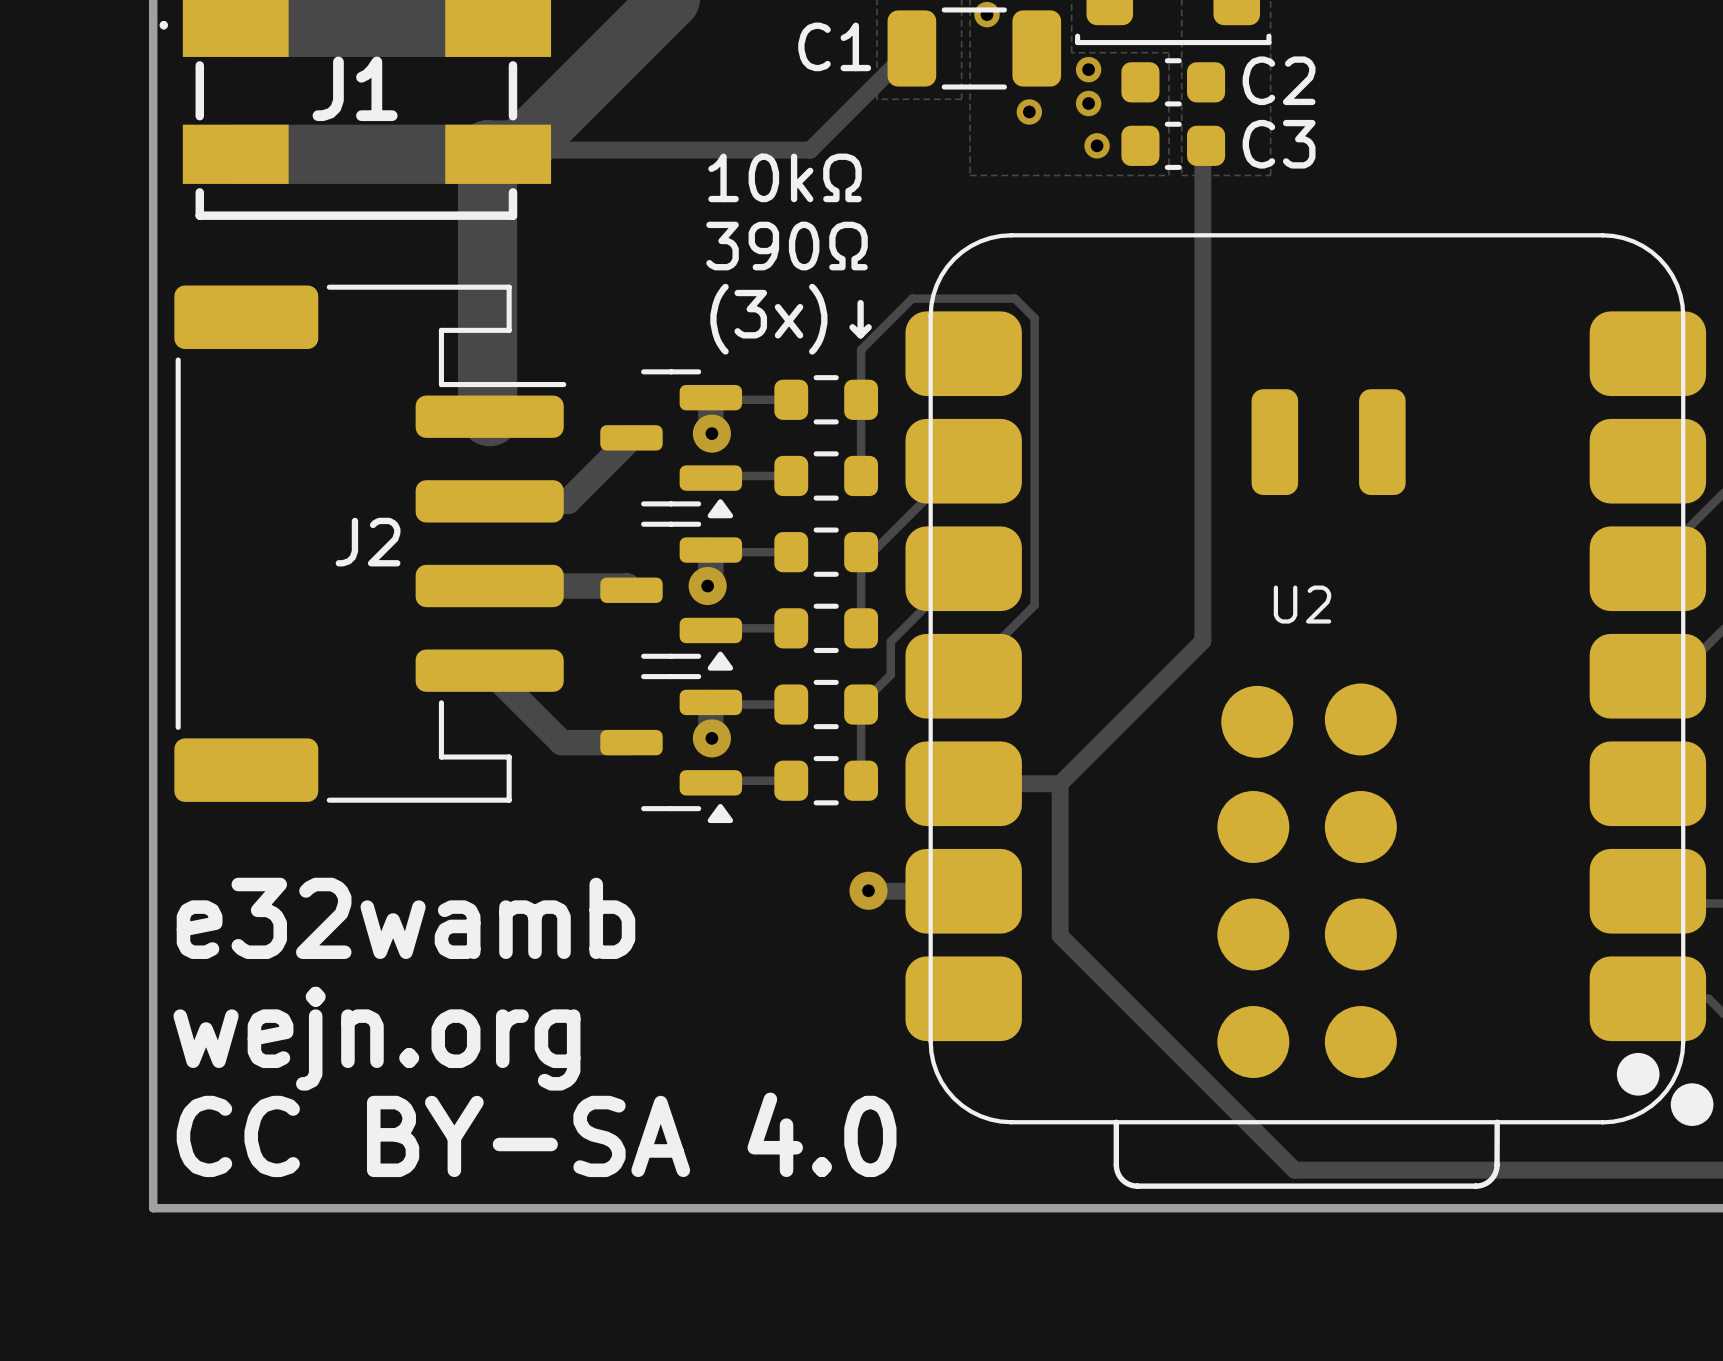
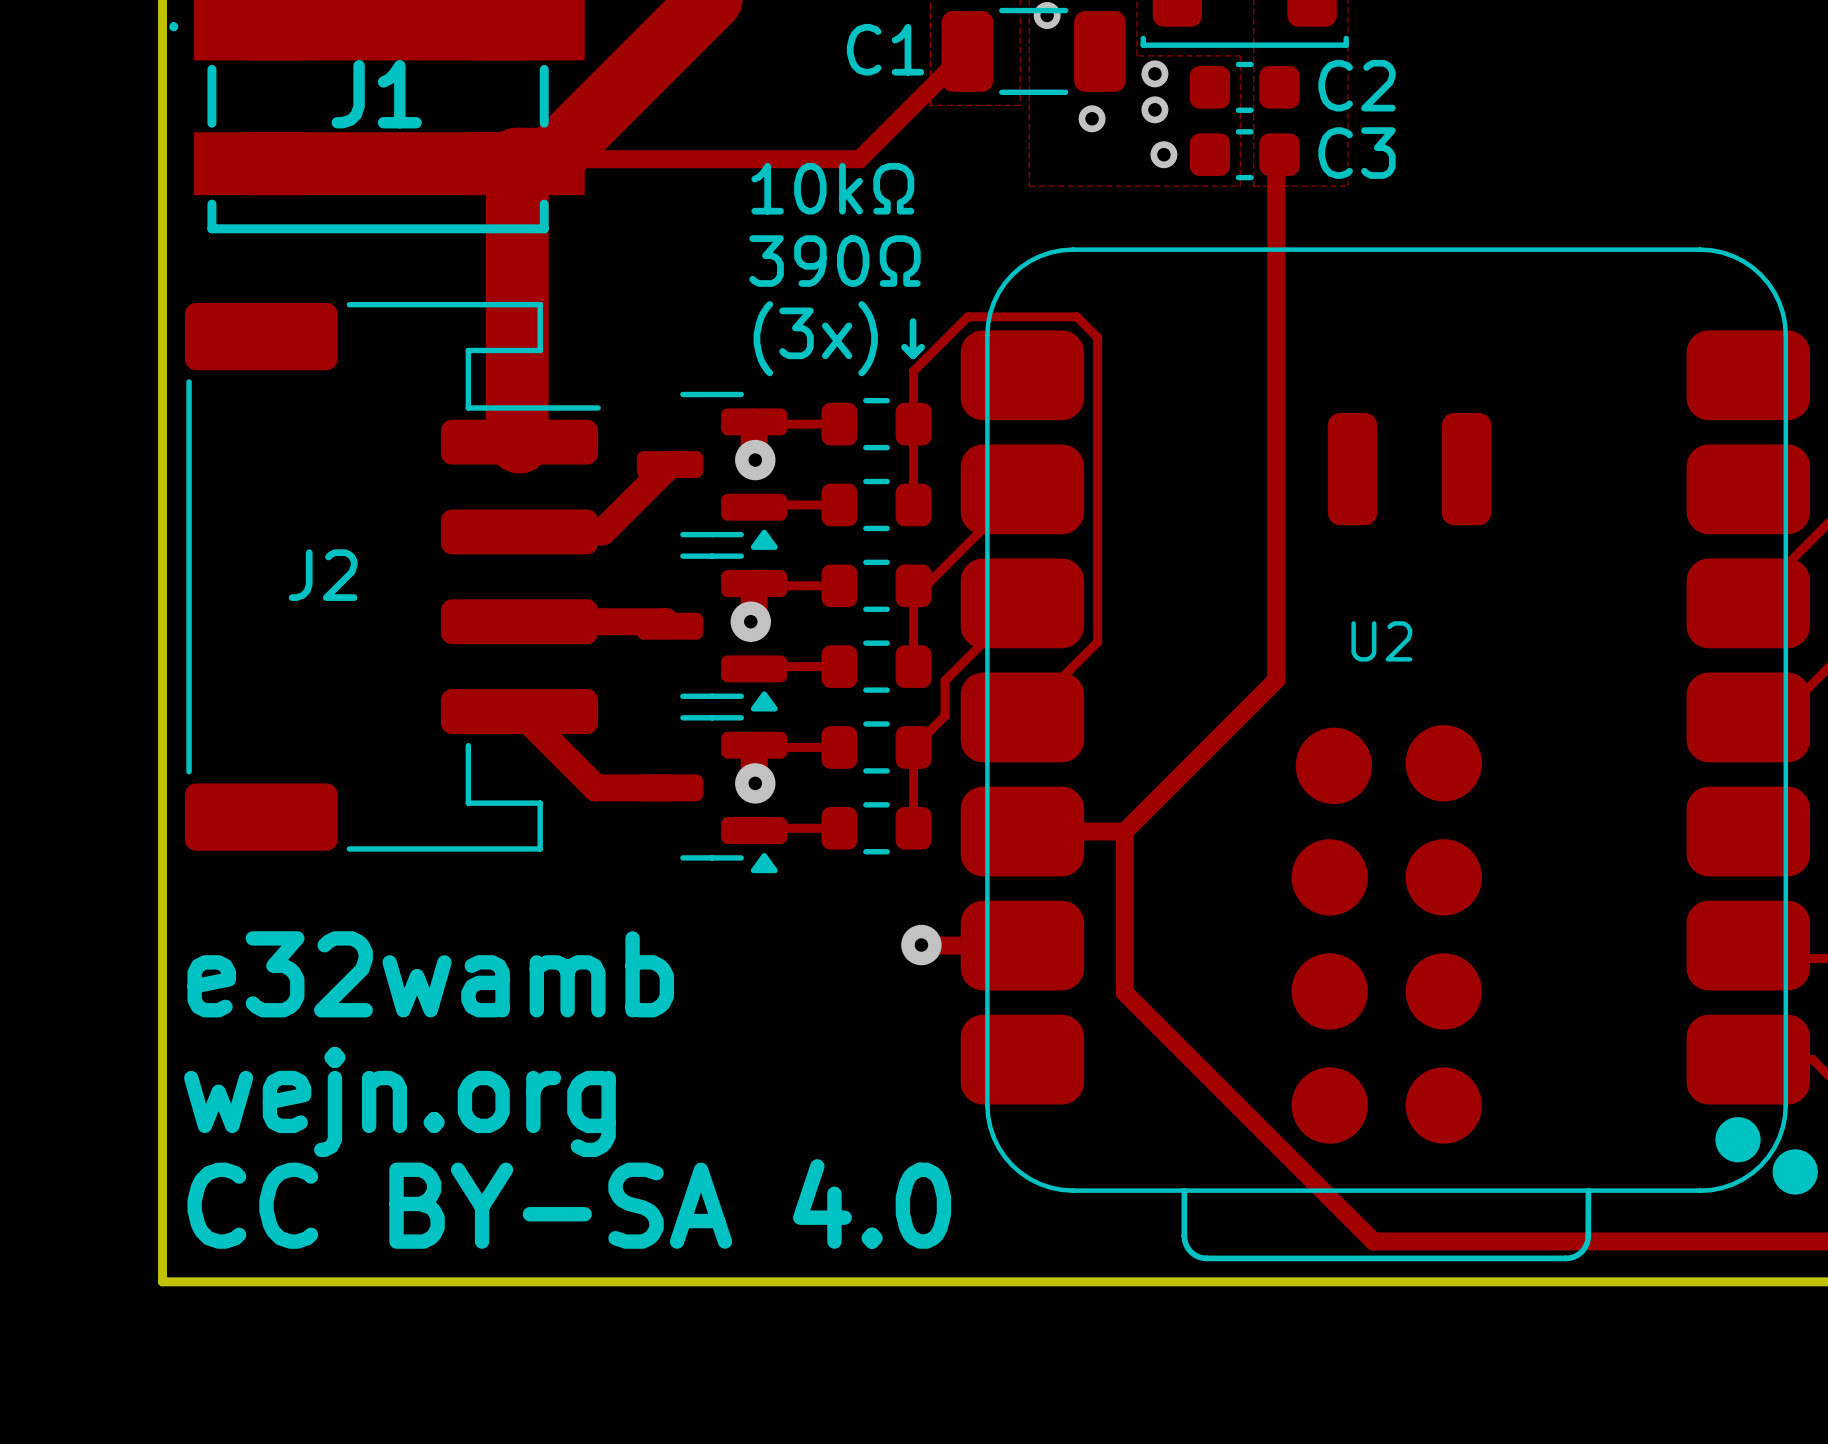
J2 name position: J2 (368, 542) -> J2 (323, 575)

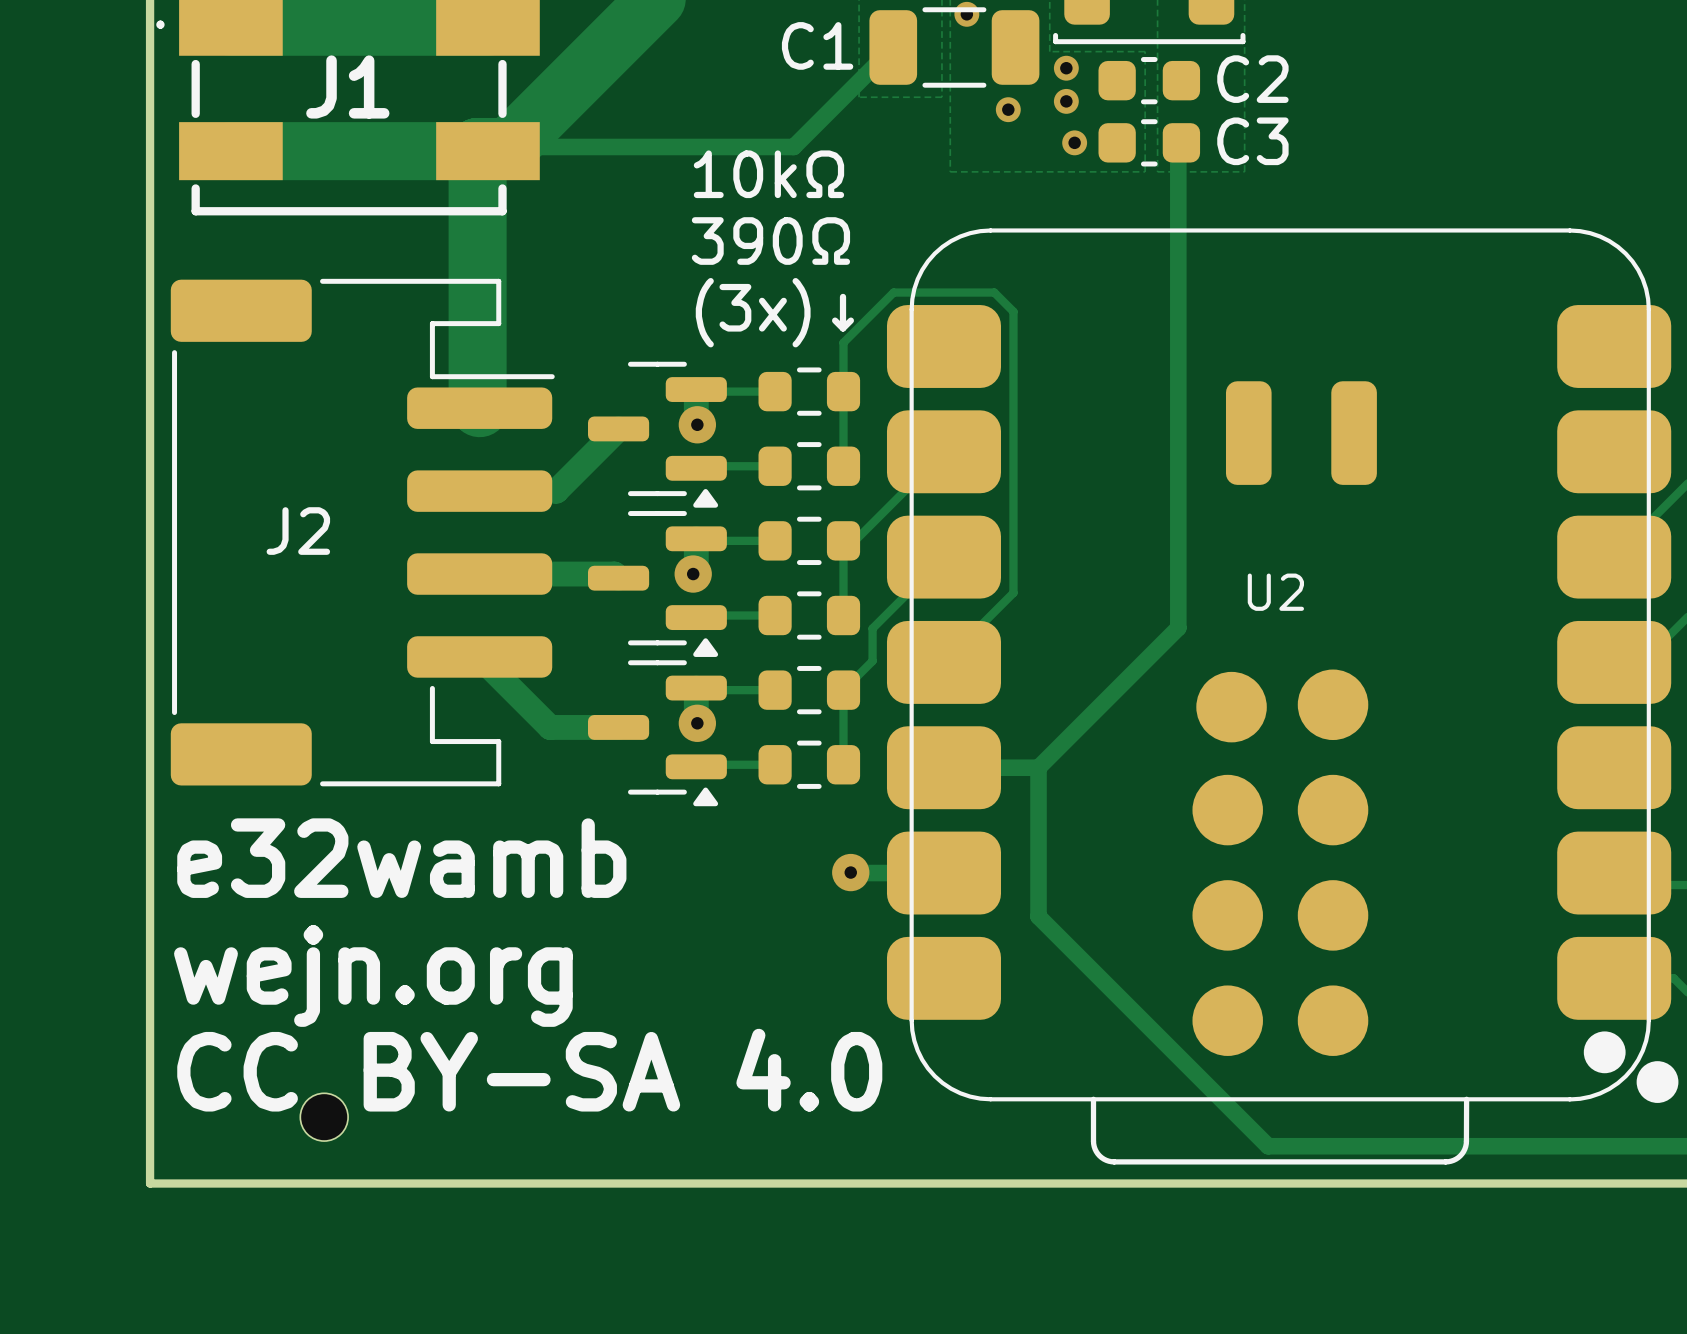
text position: e32wamb (430, 974) -> e32wamb (401, 858)
text position: wejn.org (399, 1101) -> wejn.org (373, 975)
text position: CC BY-SA 4.0 (569, 1203) -> CC BY-SA 4.0 (529, 1070)
part: none -> (324, 1117)

